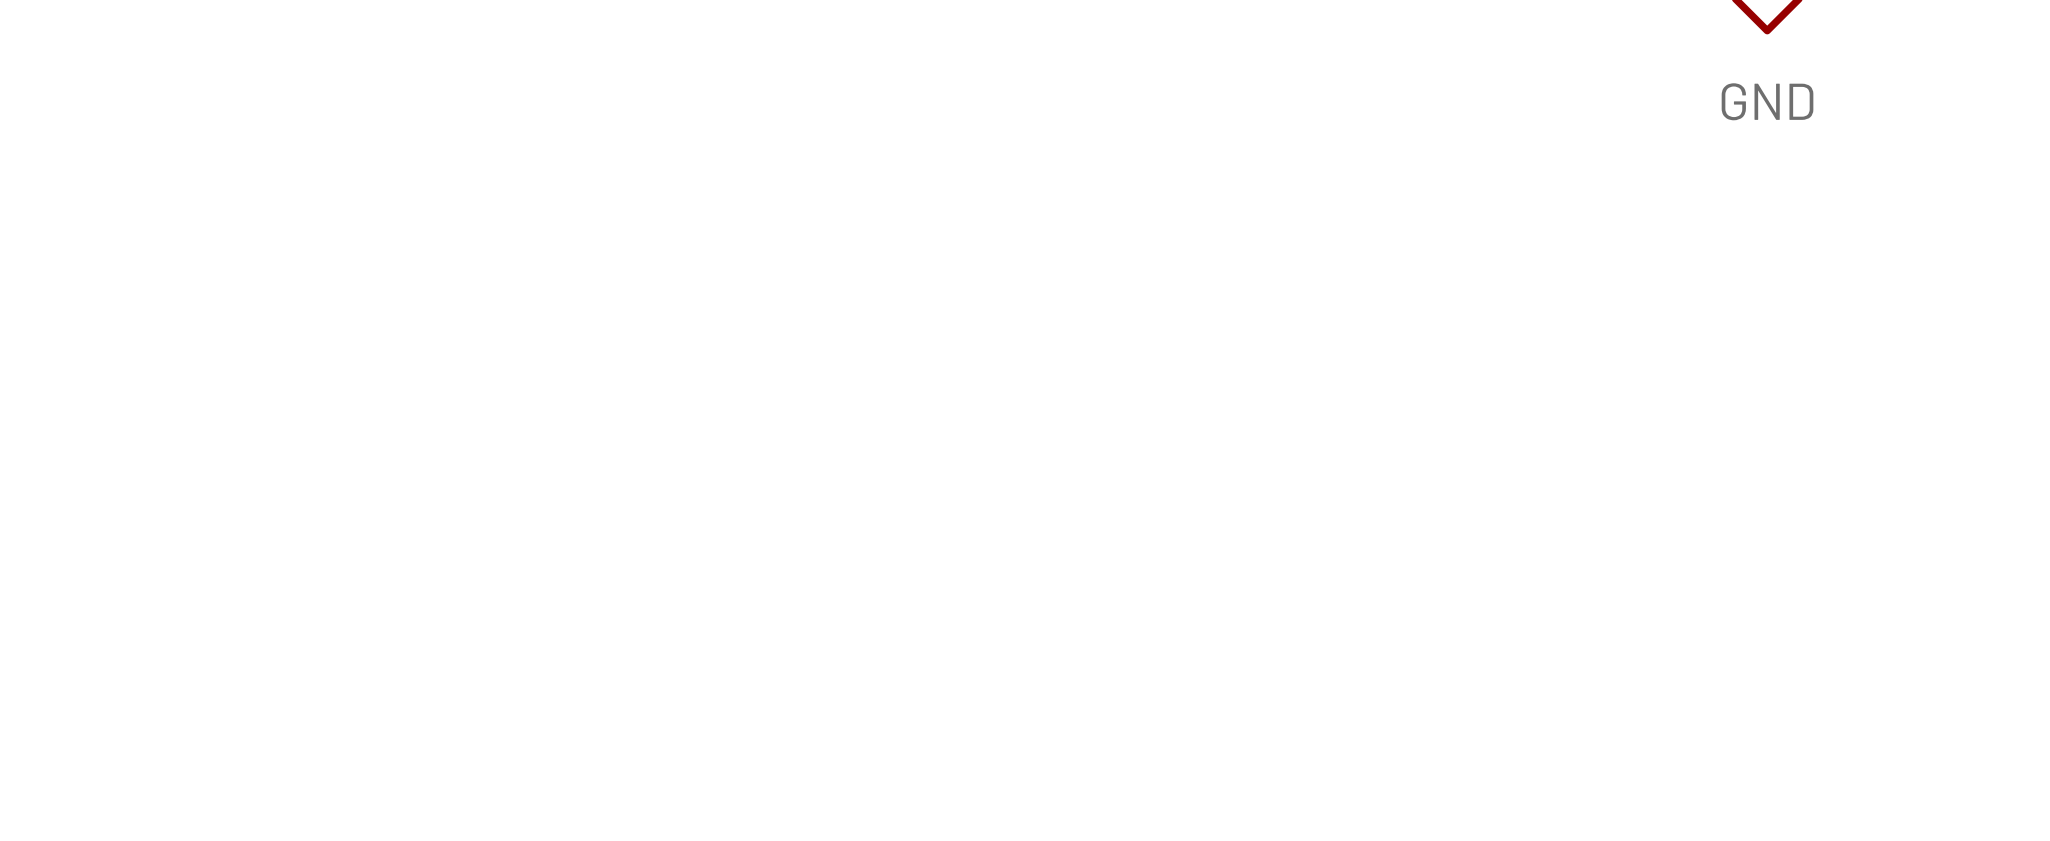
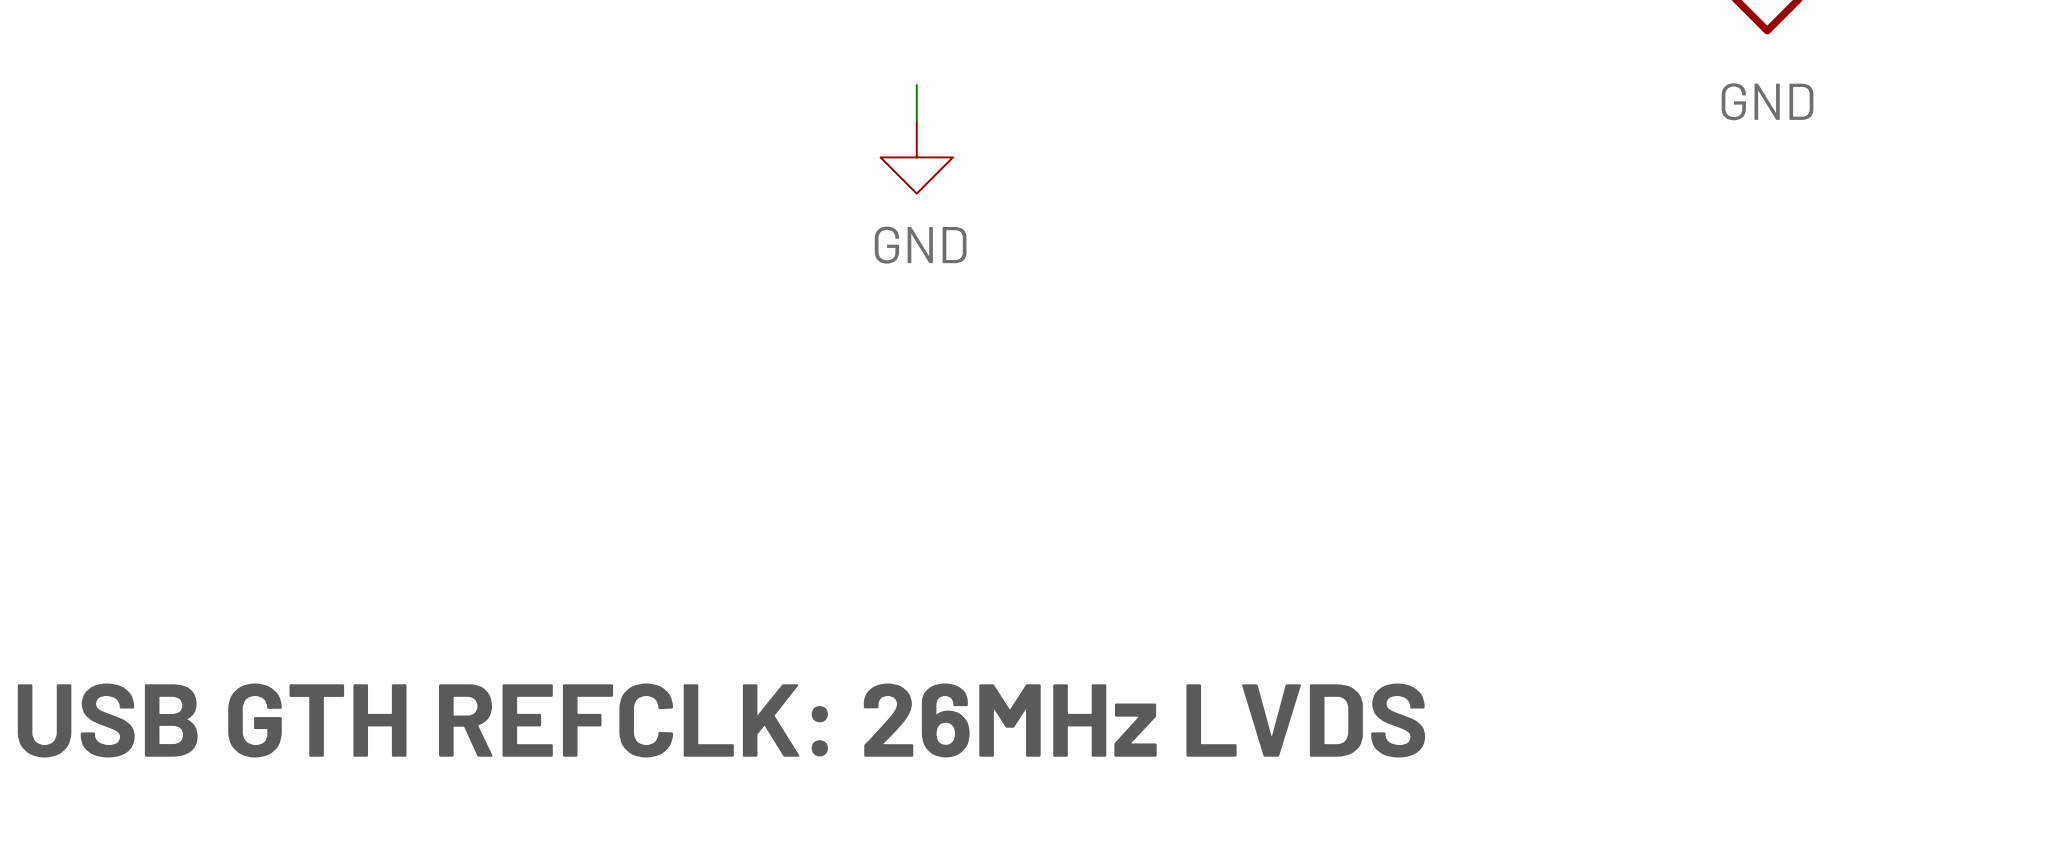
wire: none -> (916, 85) (916, 121)
power symbol: none -> GND (916, 157)
text: none -> USB GTH REFCLK: 26MHz LVDS (721, 720)

